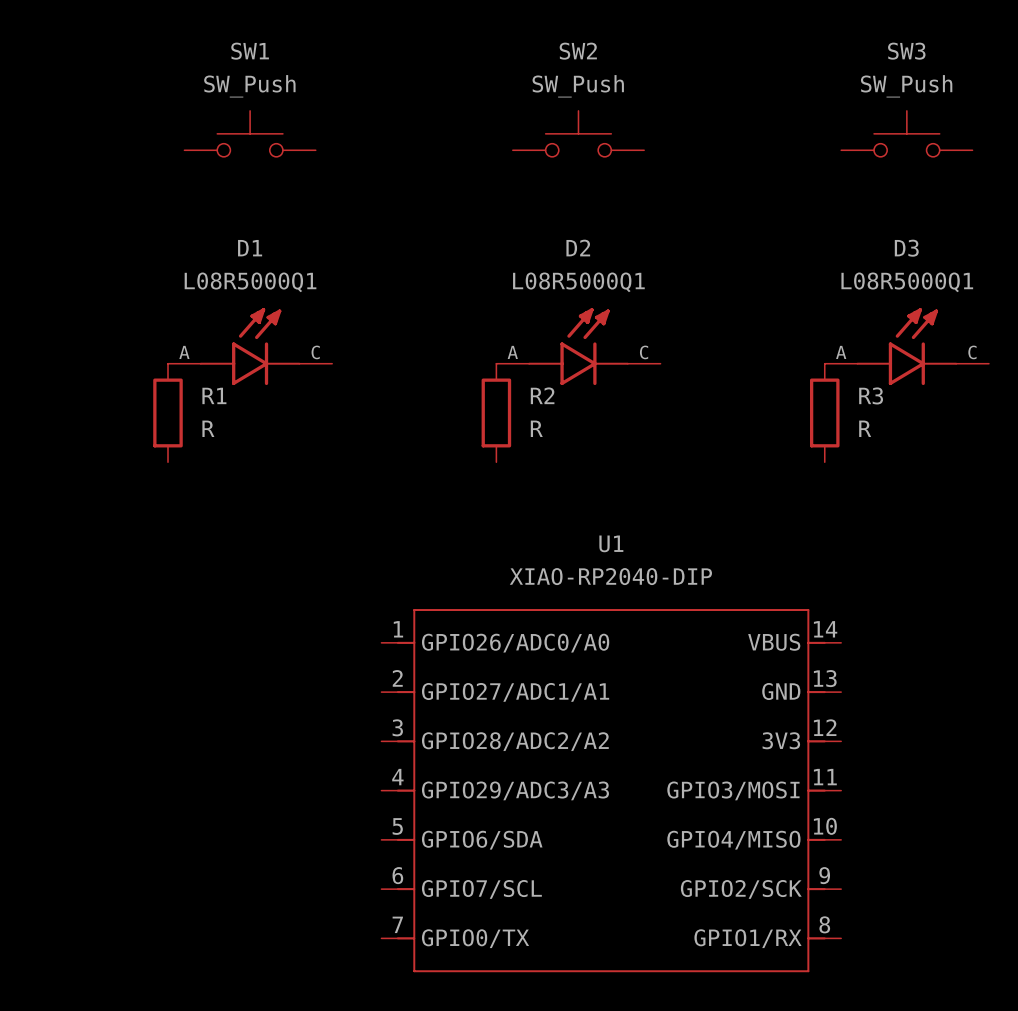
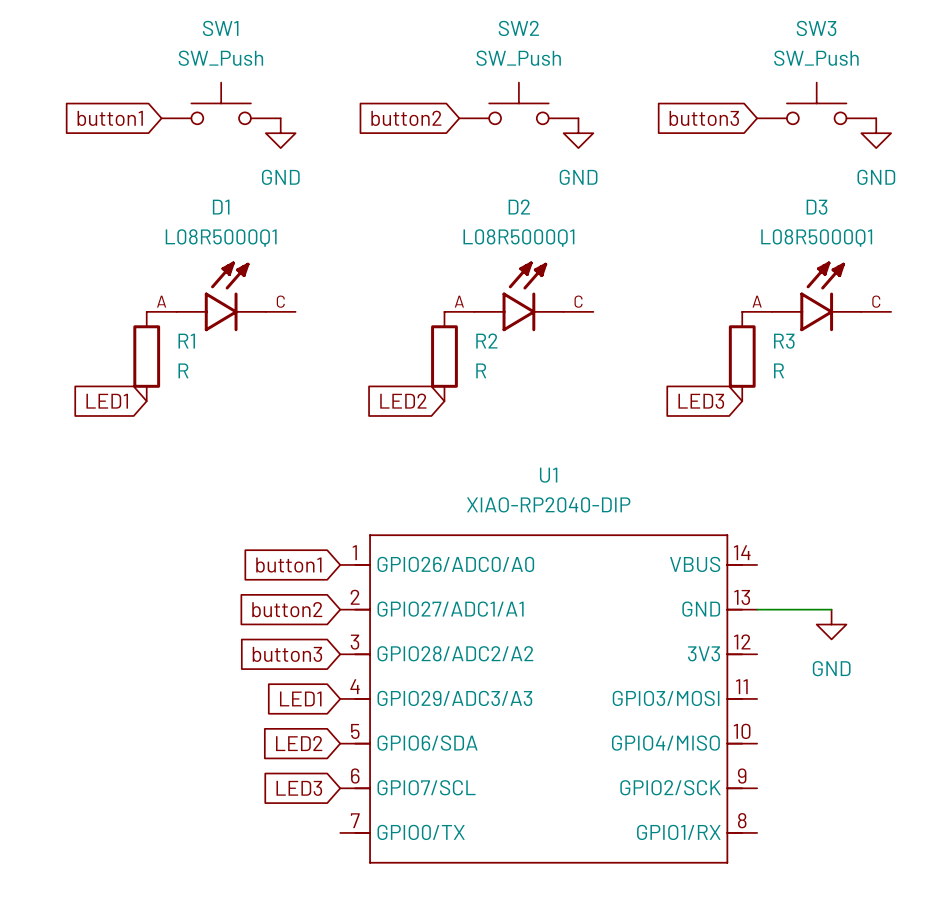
global label: none -> button1 (110, 118)
global label: none -> button2 (406, 118)
global label: none -> button3 (704, 118)
power symbol: none -> GND (280, 133)
power symbol: none -> GND (578, 133)
power symbol: none -> GND (876, 133)
global label: none -> LED1 (107, 401)
global label: none -> LED2 (403, 401)
global label: none -> LED3 (701, 401)
global label: none -> button1 (288, 565)
global label: none -> button2 (287, 609)
wire: none -> (757, 609) (831, 609)
power symbol: none -> GND (831, 624)
global label: none -> button3 (287, 654)
global label: none -> LED1 (300, 698)
global label: none -> LED2 (299, 743)
global label: none -> LED3 (299, 788)

